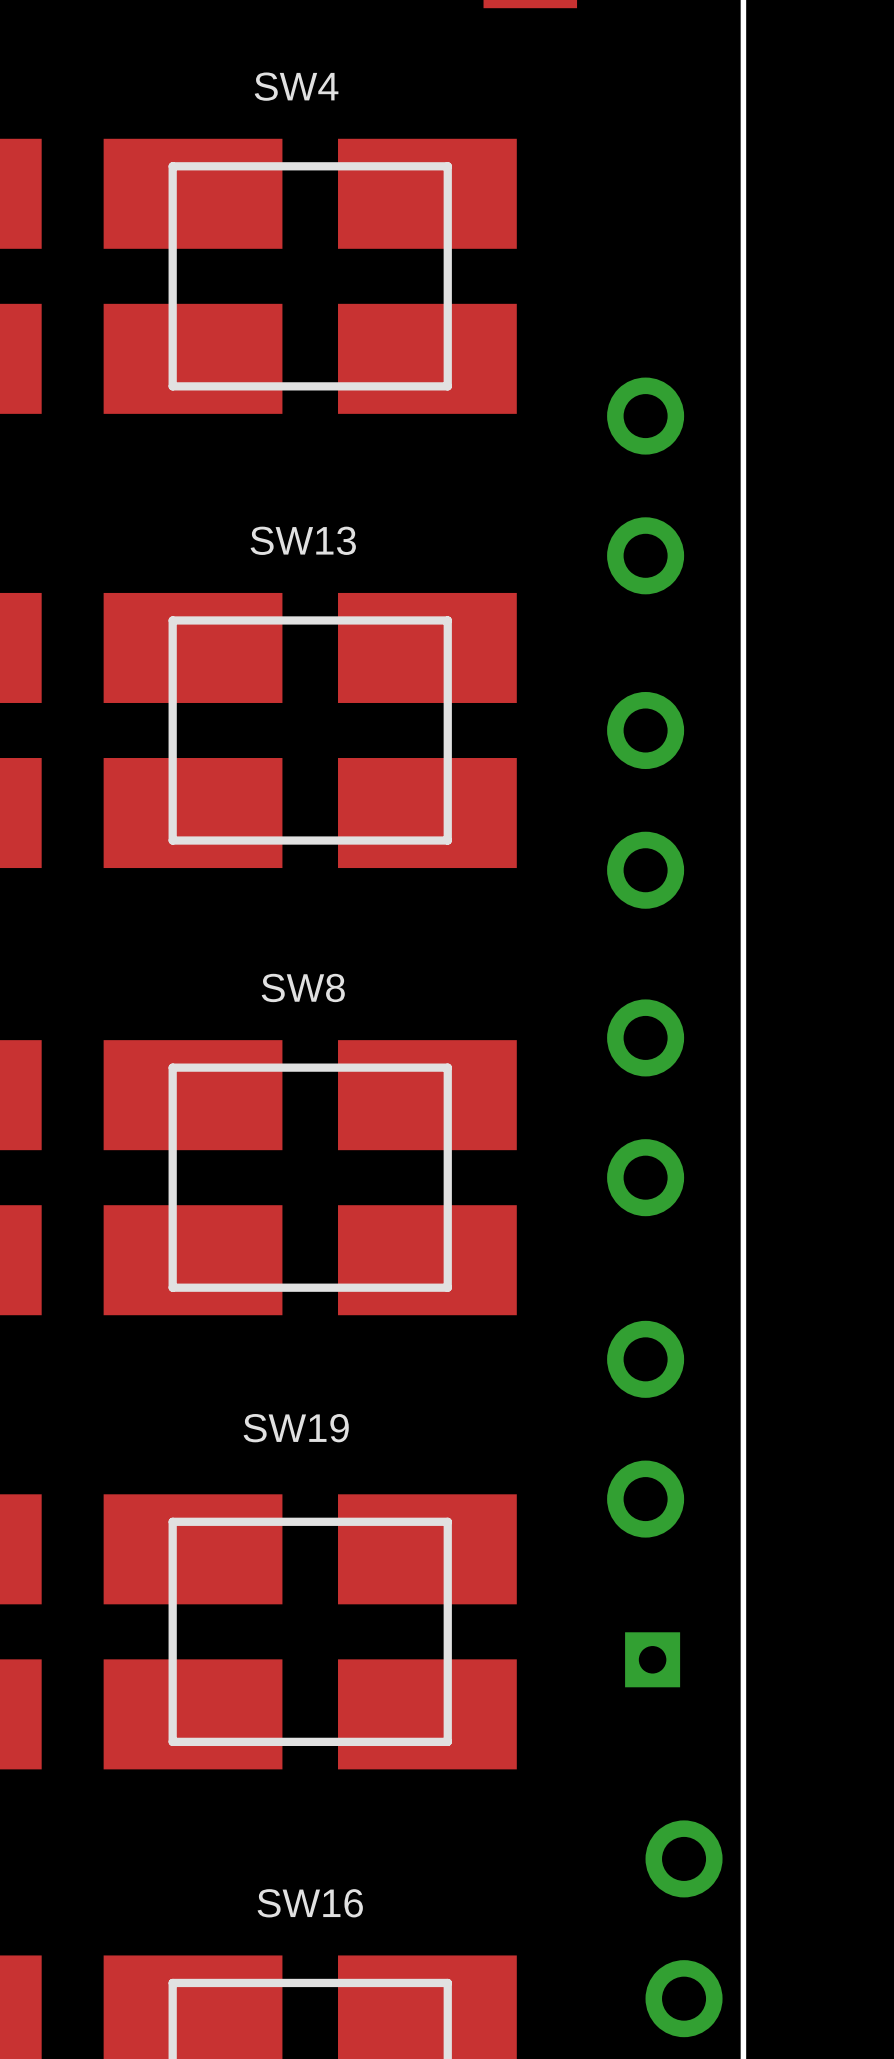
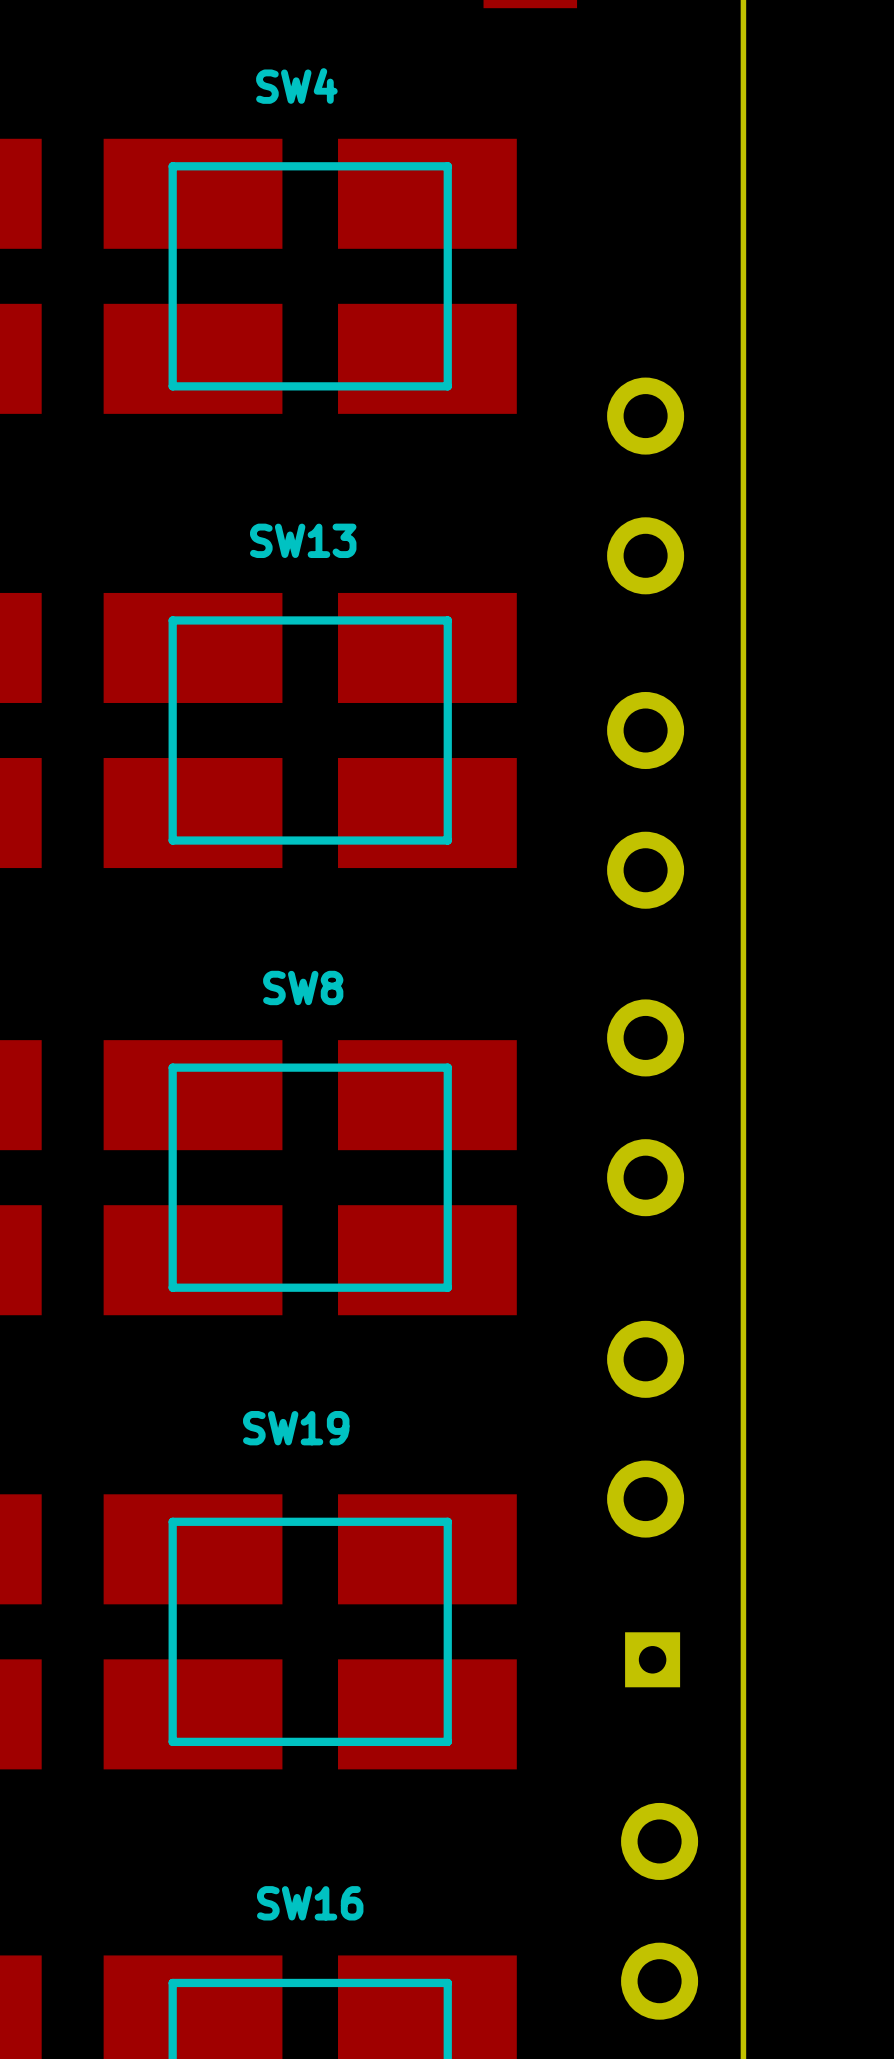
part position: (684, 1928) -> (659, 1911)

